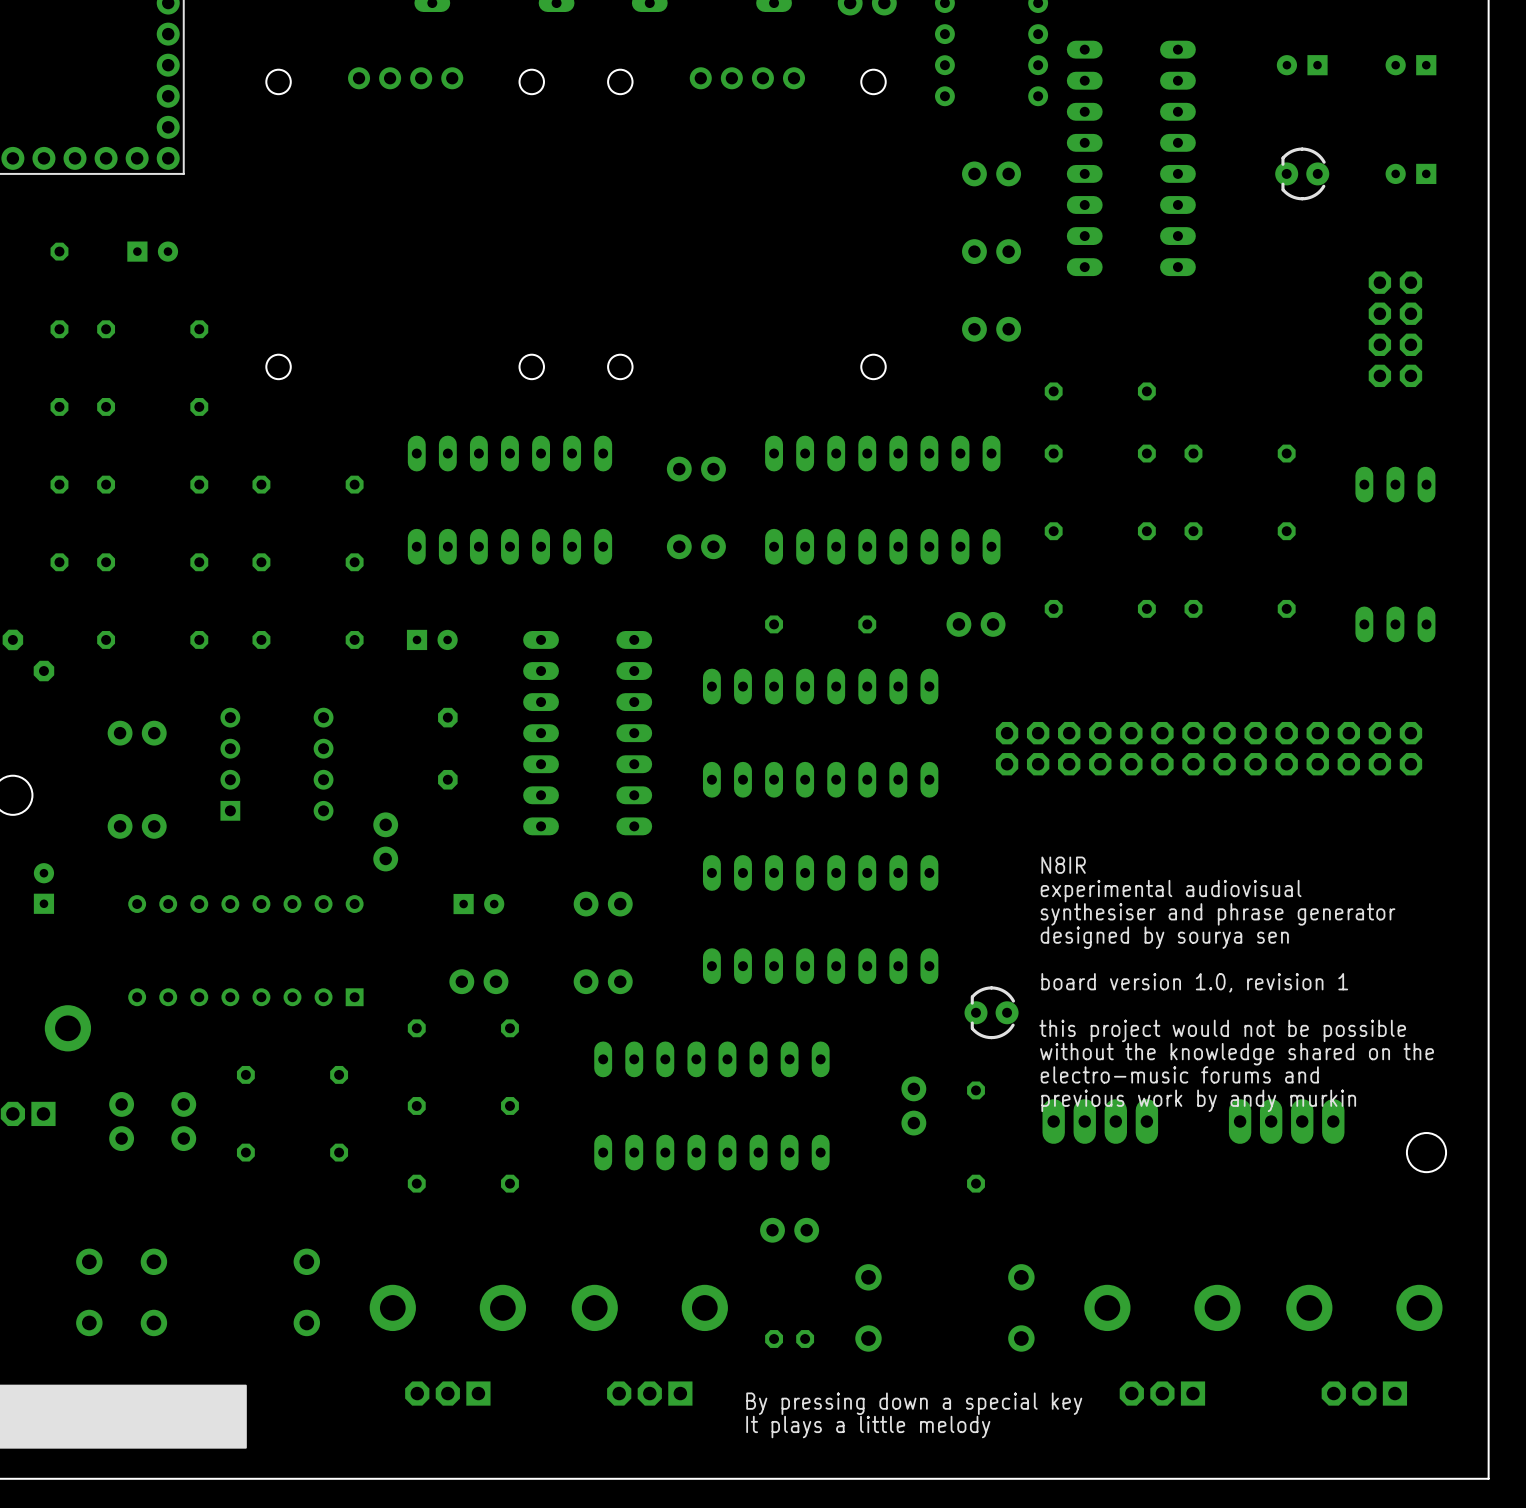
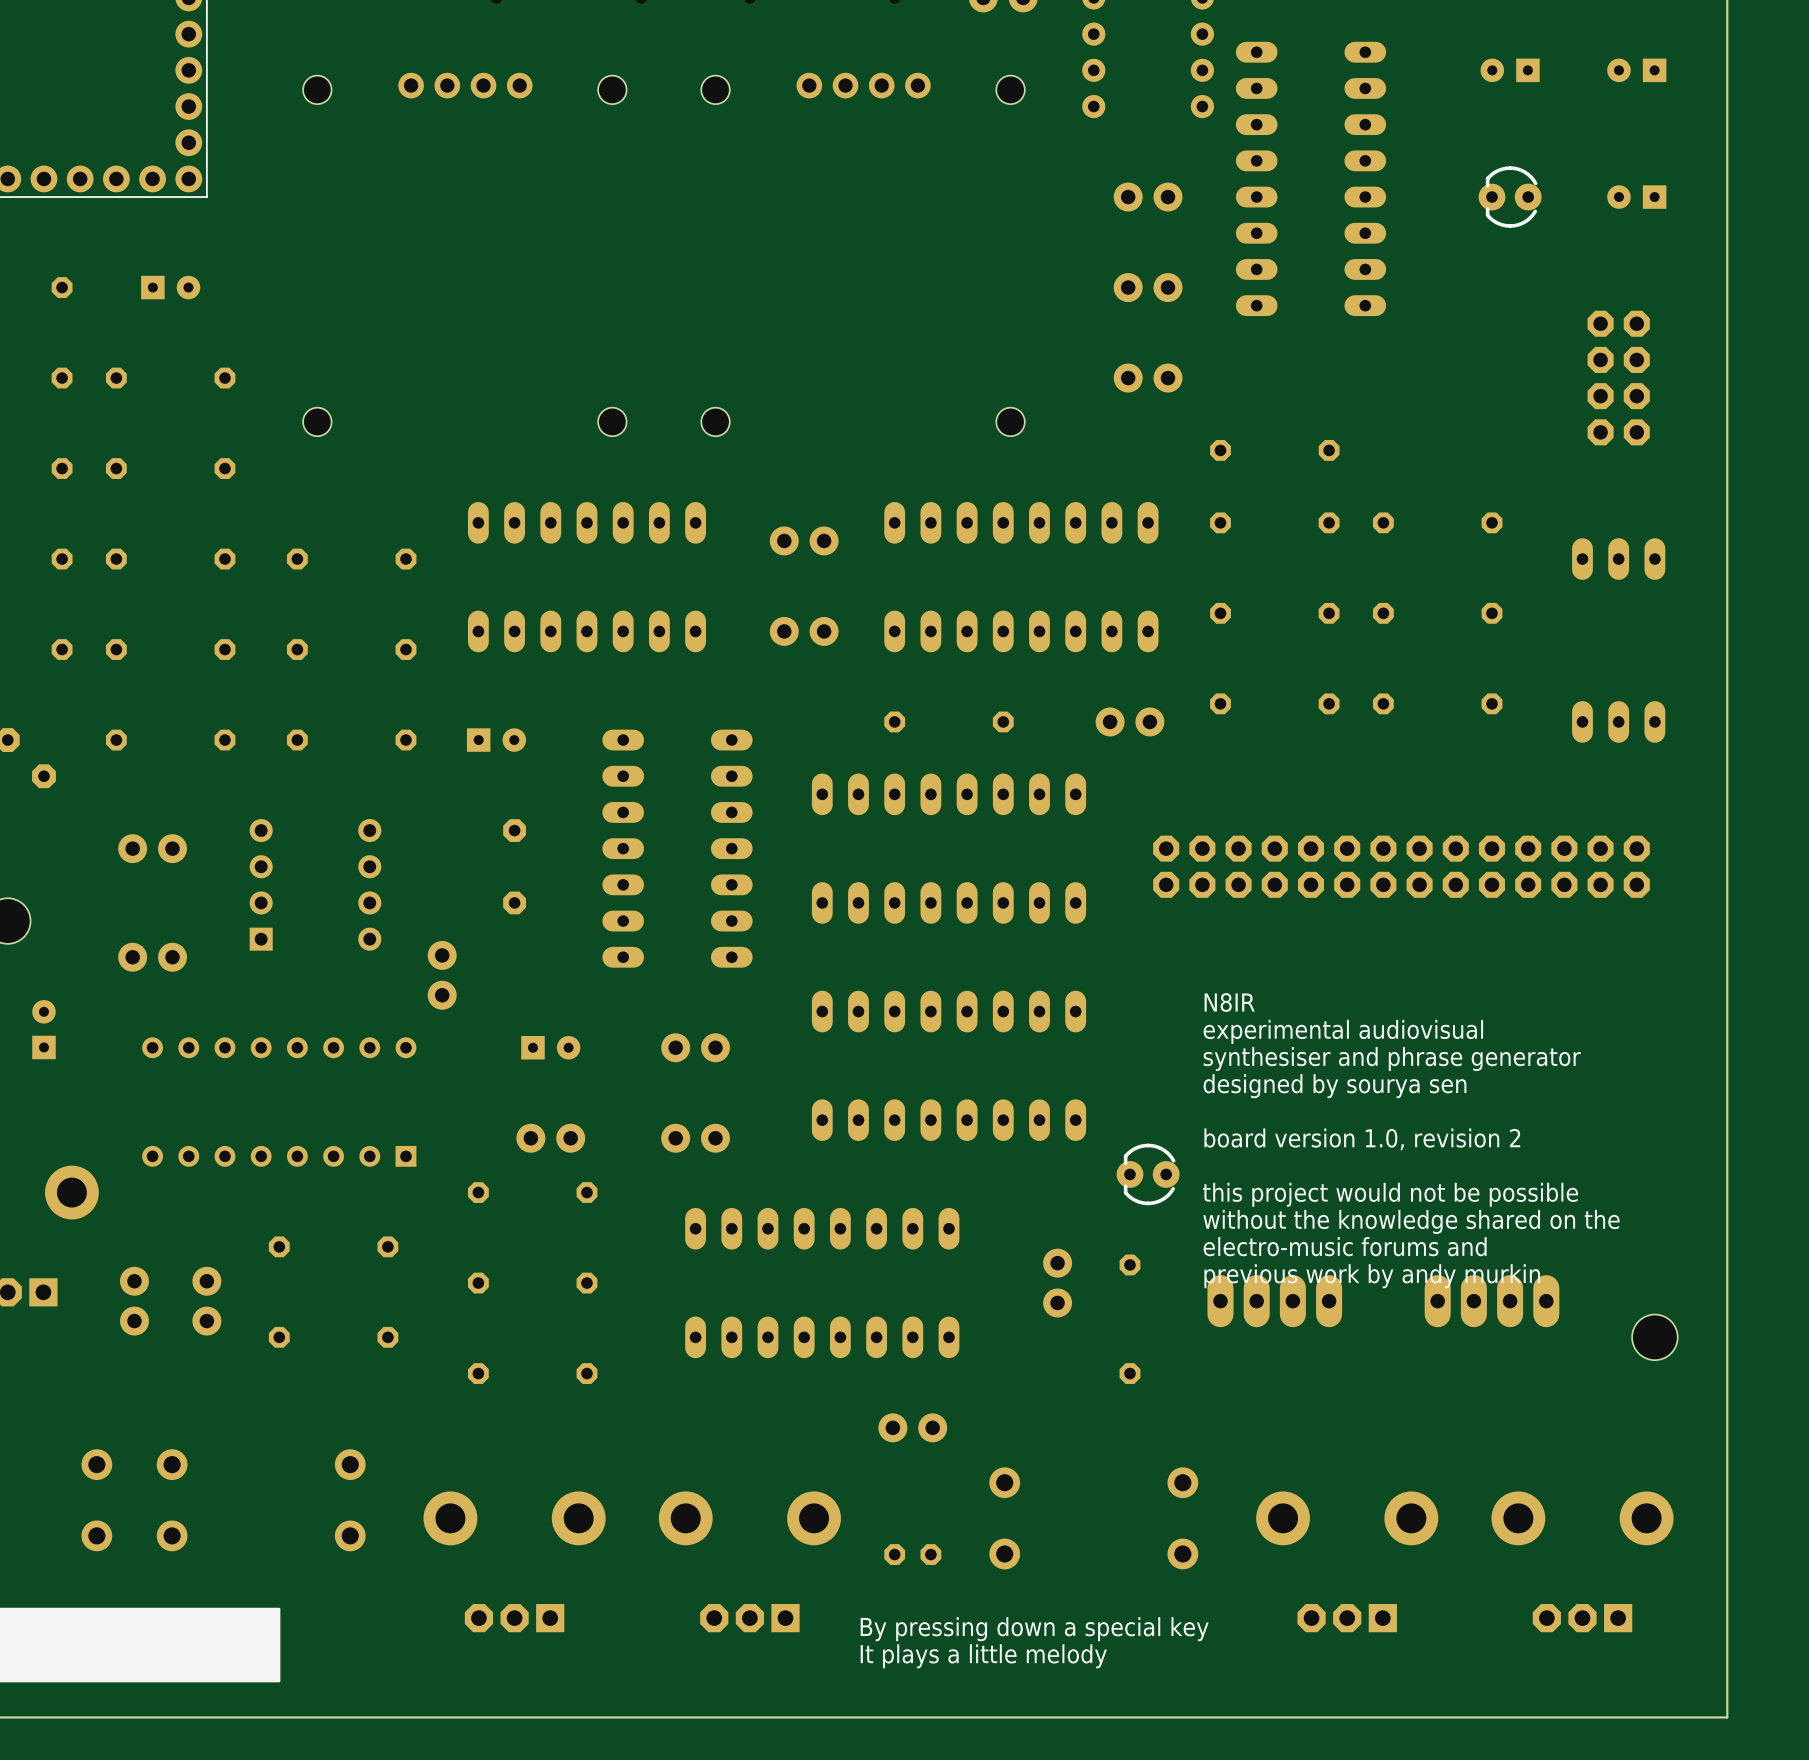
text: board version 1.0, revision 1 (1194, 982) -> board version 1.0, revision 2 (1362, 1139)

